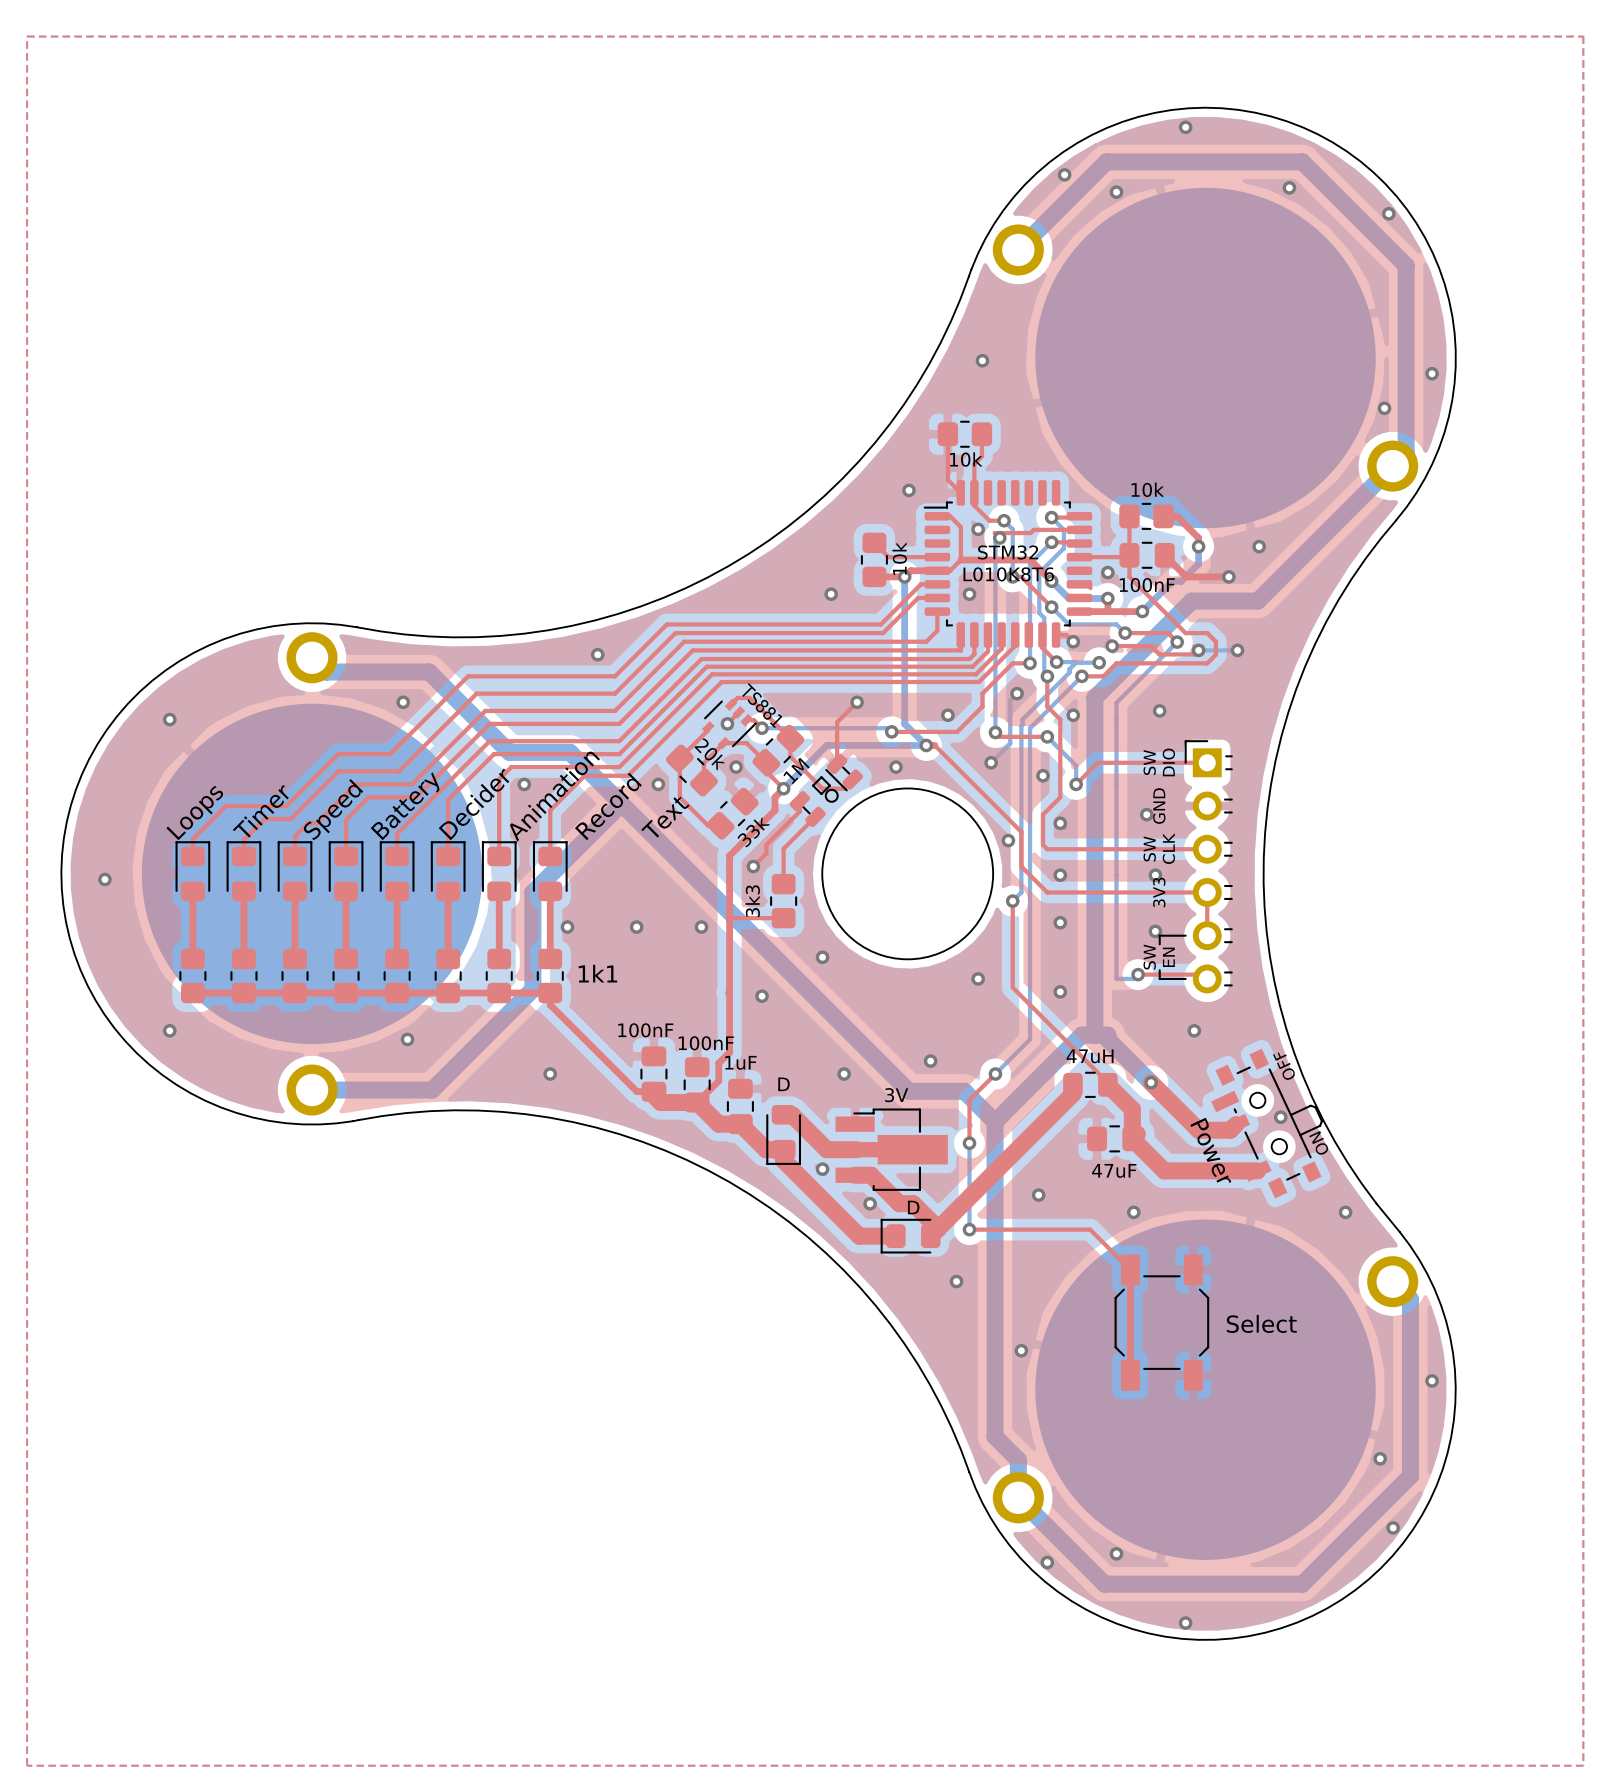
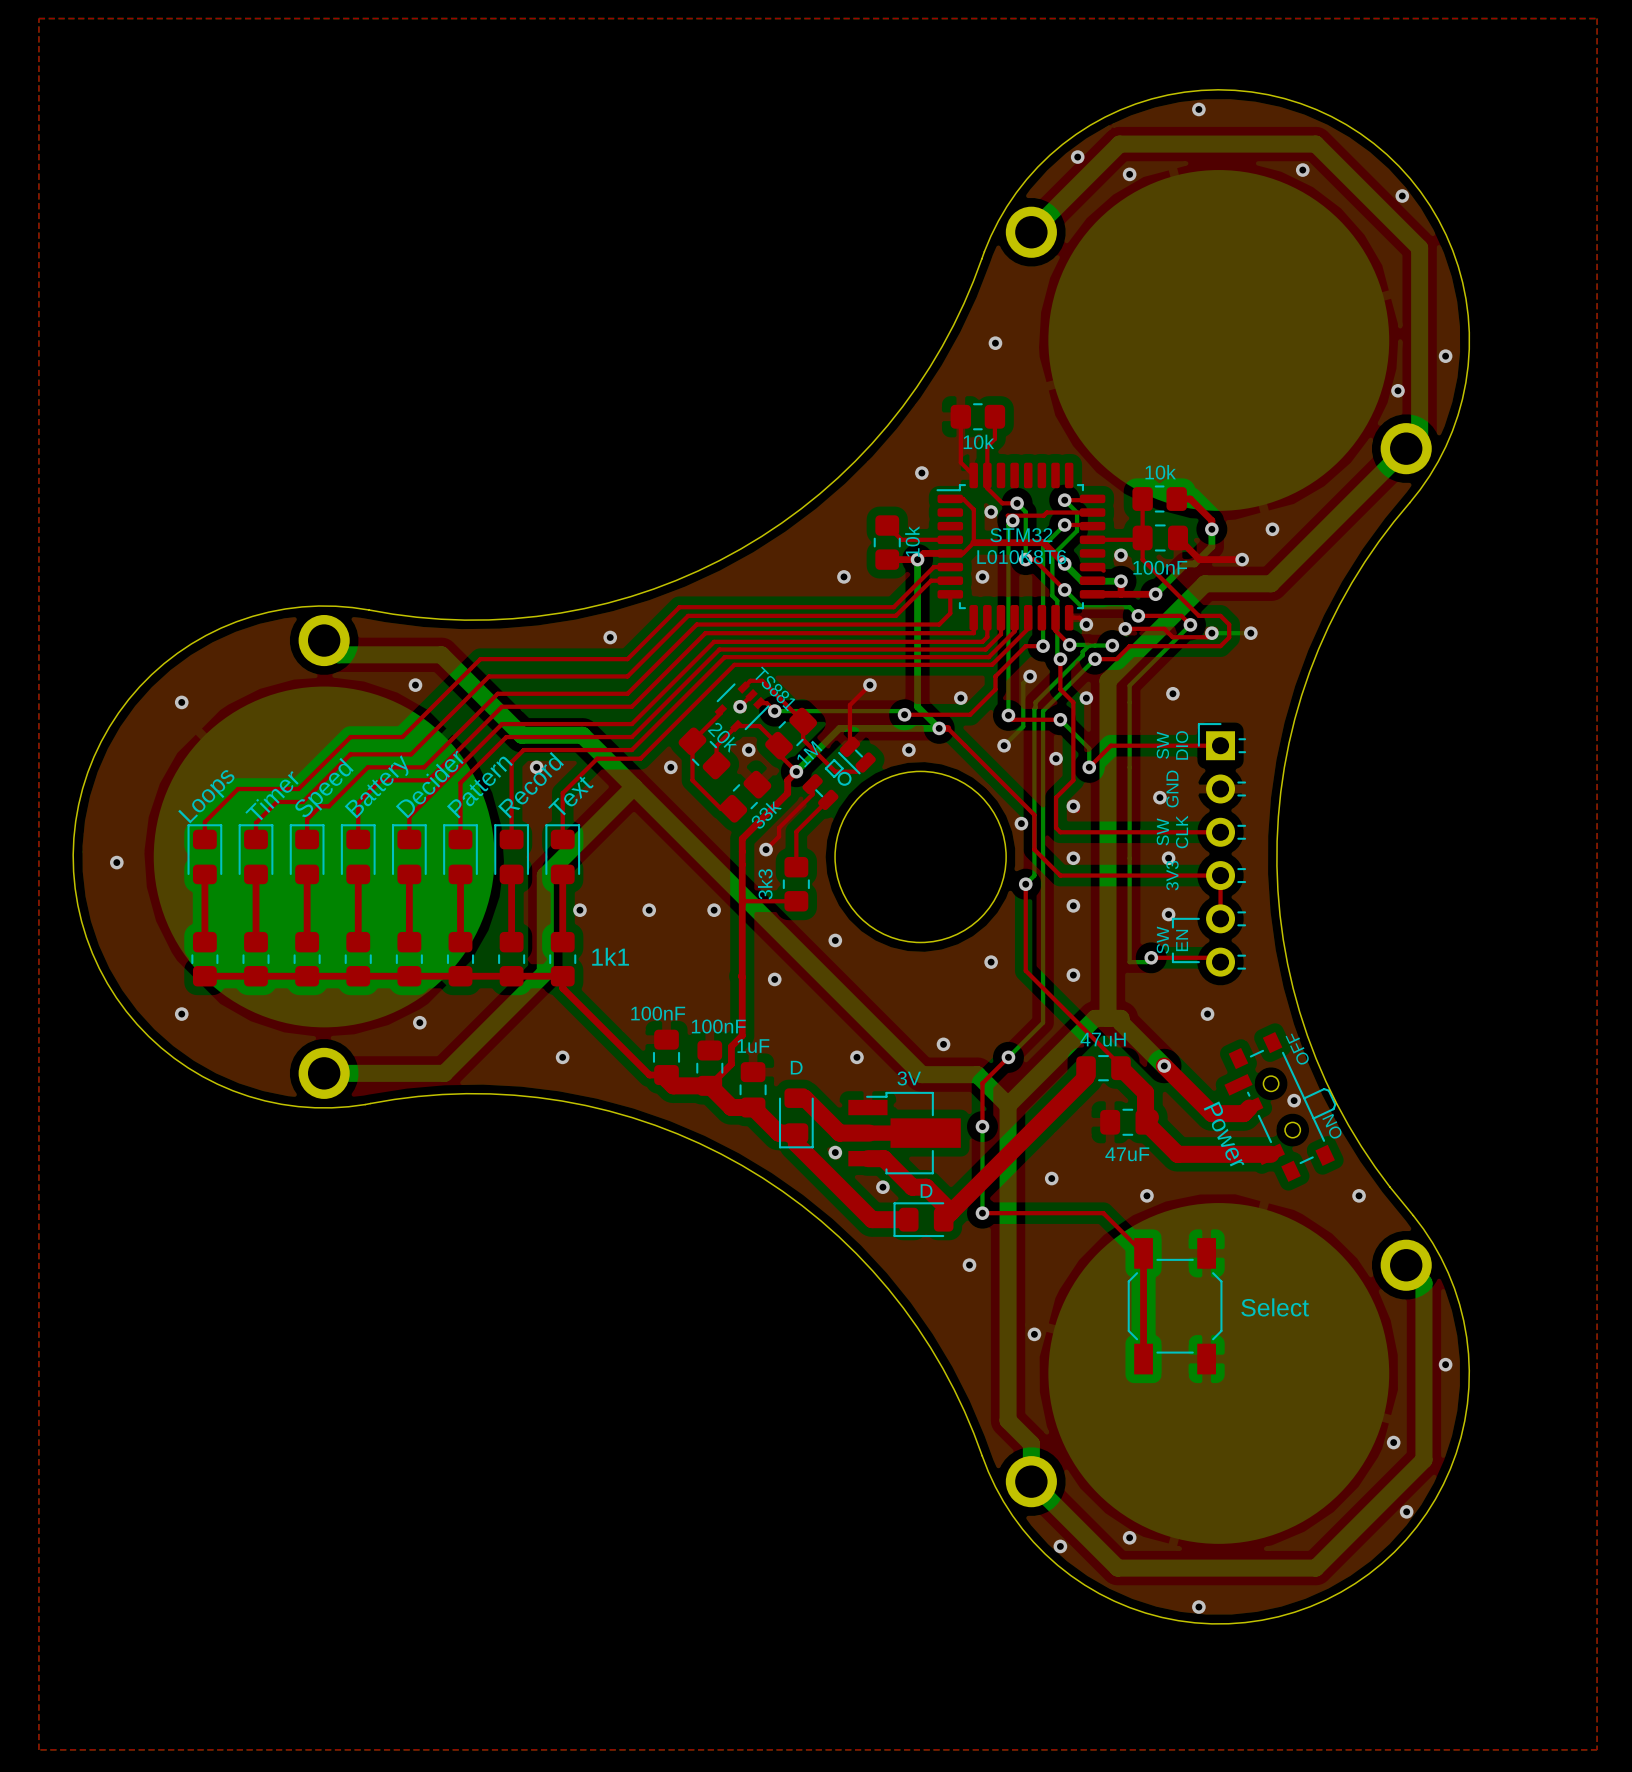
text: Animation (554, 796) -> none
text: none -> Pattern (479, 787)
text position: Decider (474, 804) -> Decider (429, 784)
text position: Battery (405, 806) -> Battery (376, 786)
text position: Record (608, 806) -> Record (531, 785)
text position: Speed (333, 809) -> Speed (324, 788)
text position: Text (665, 817) -> Text (570, 795)

